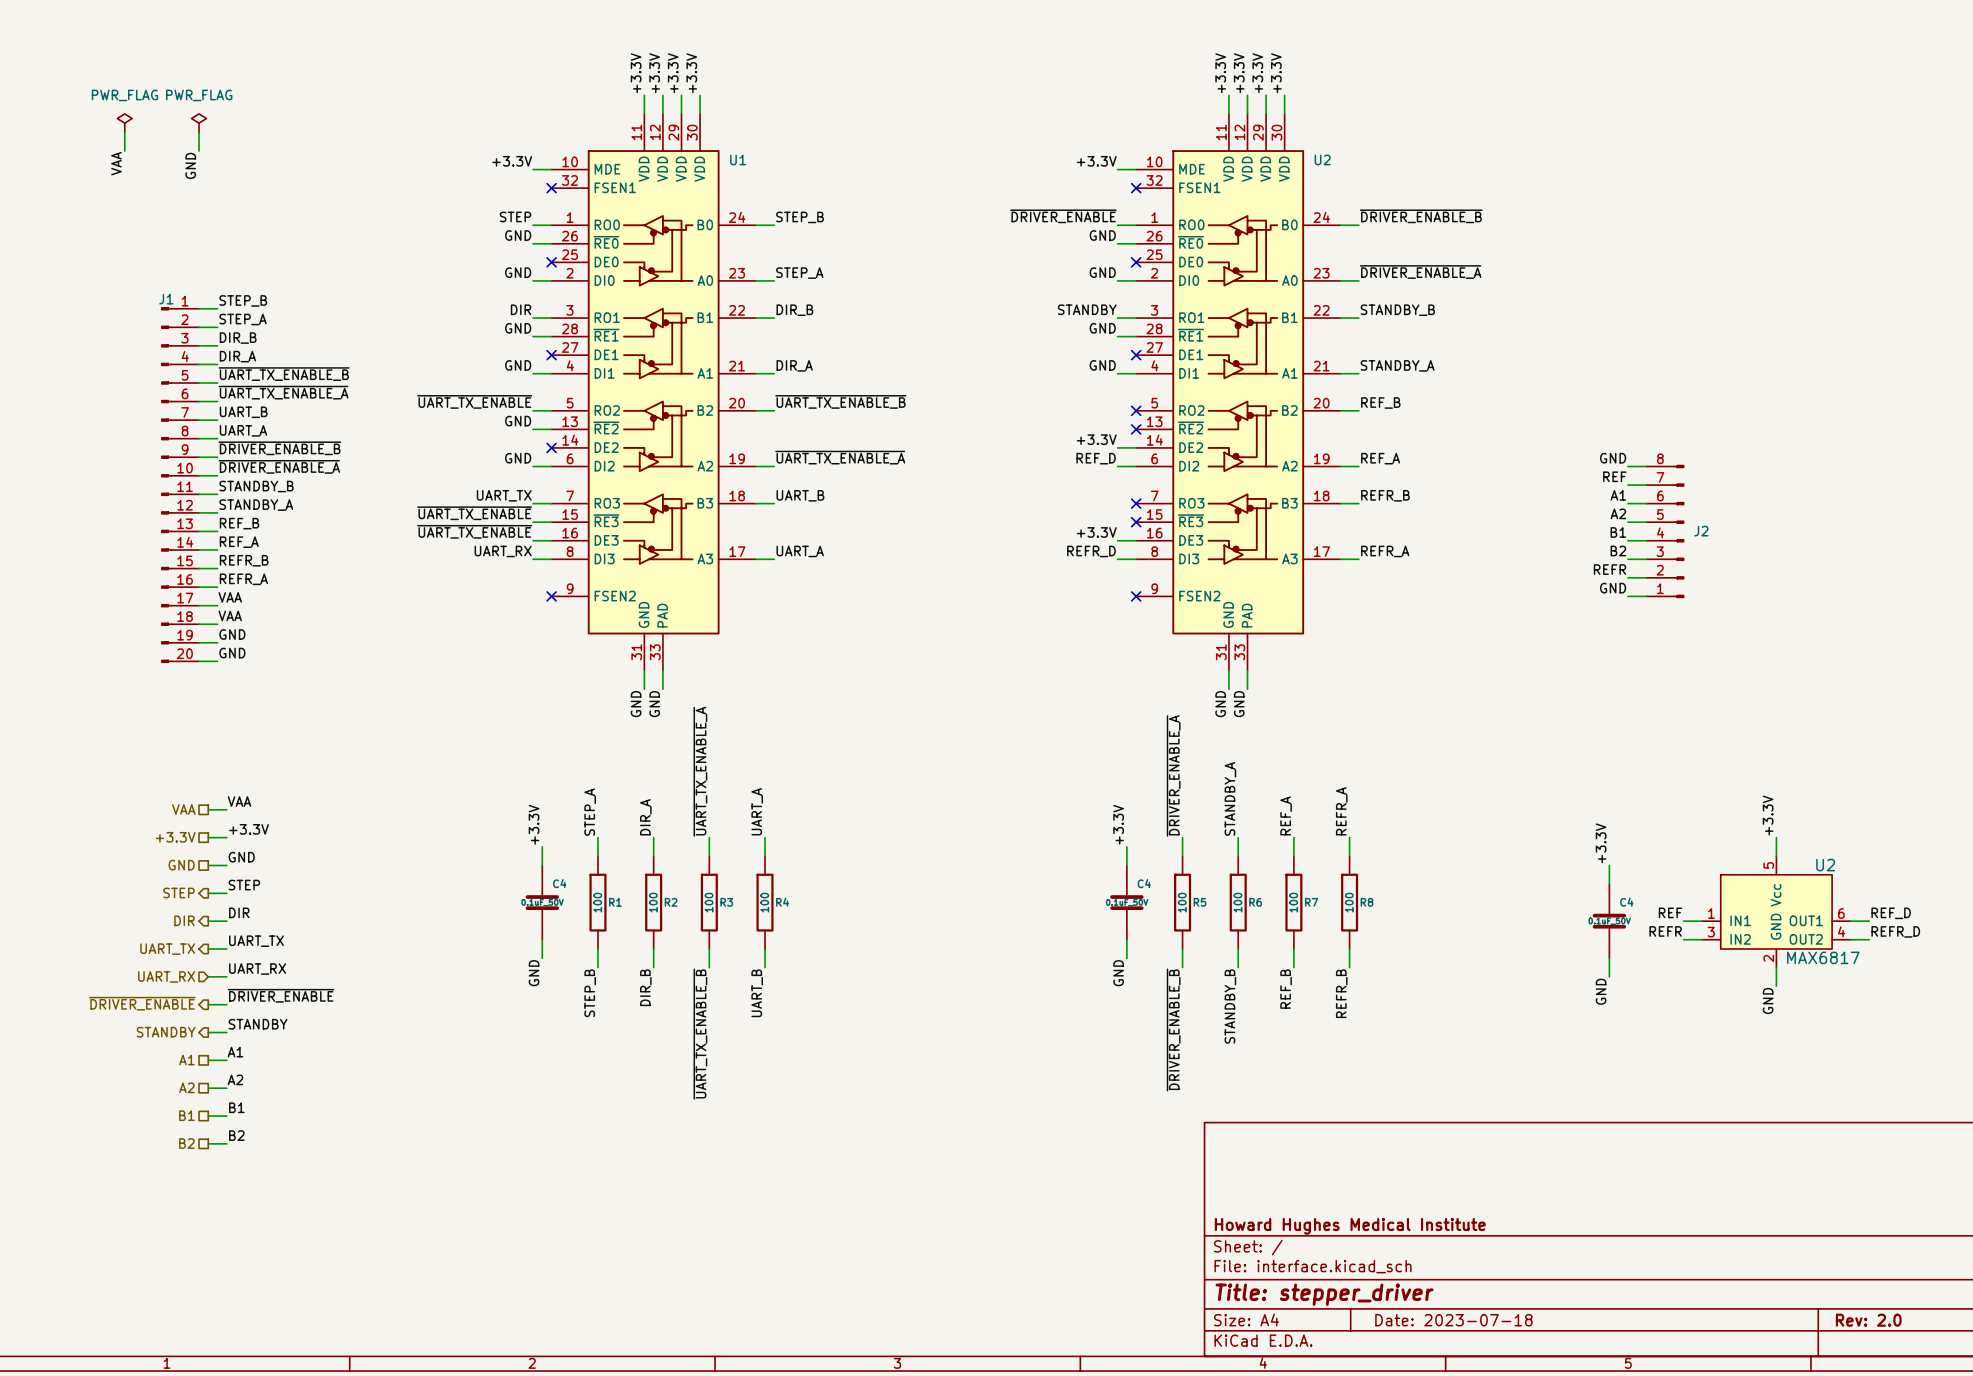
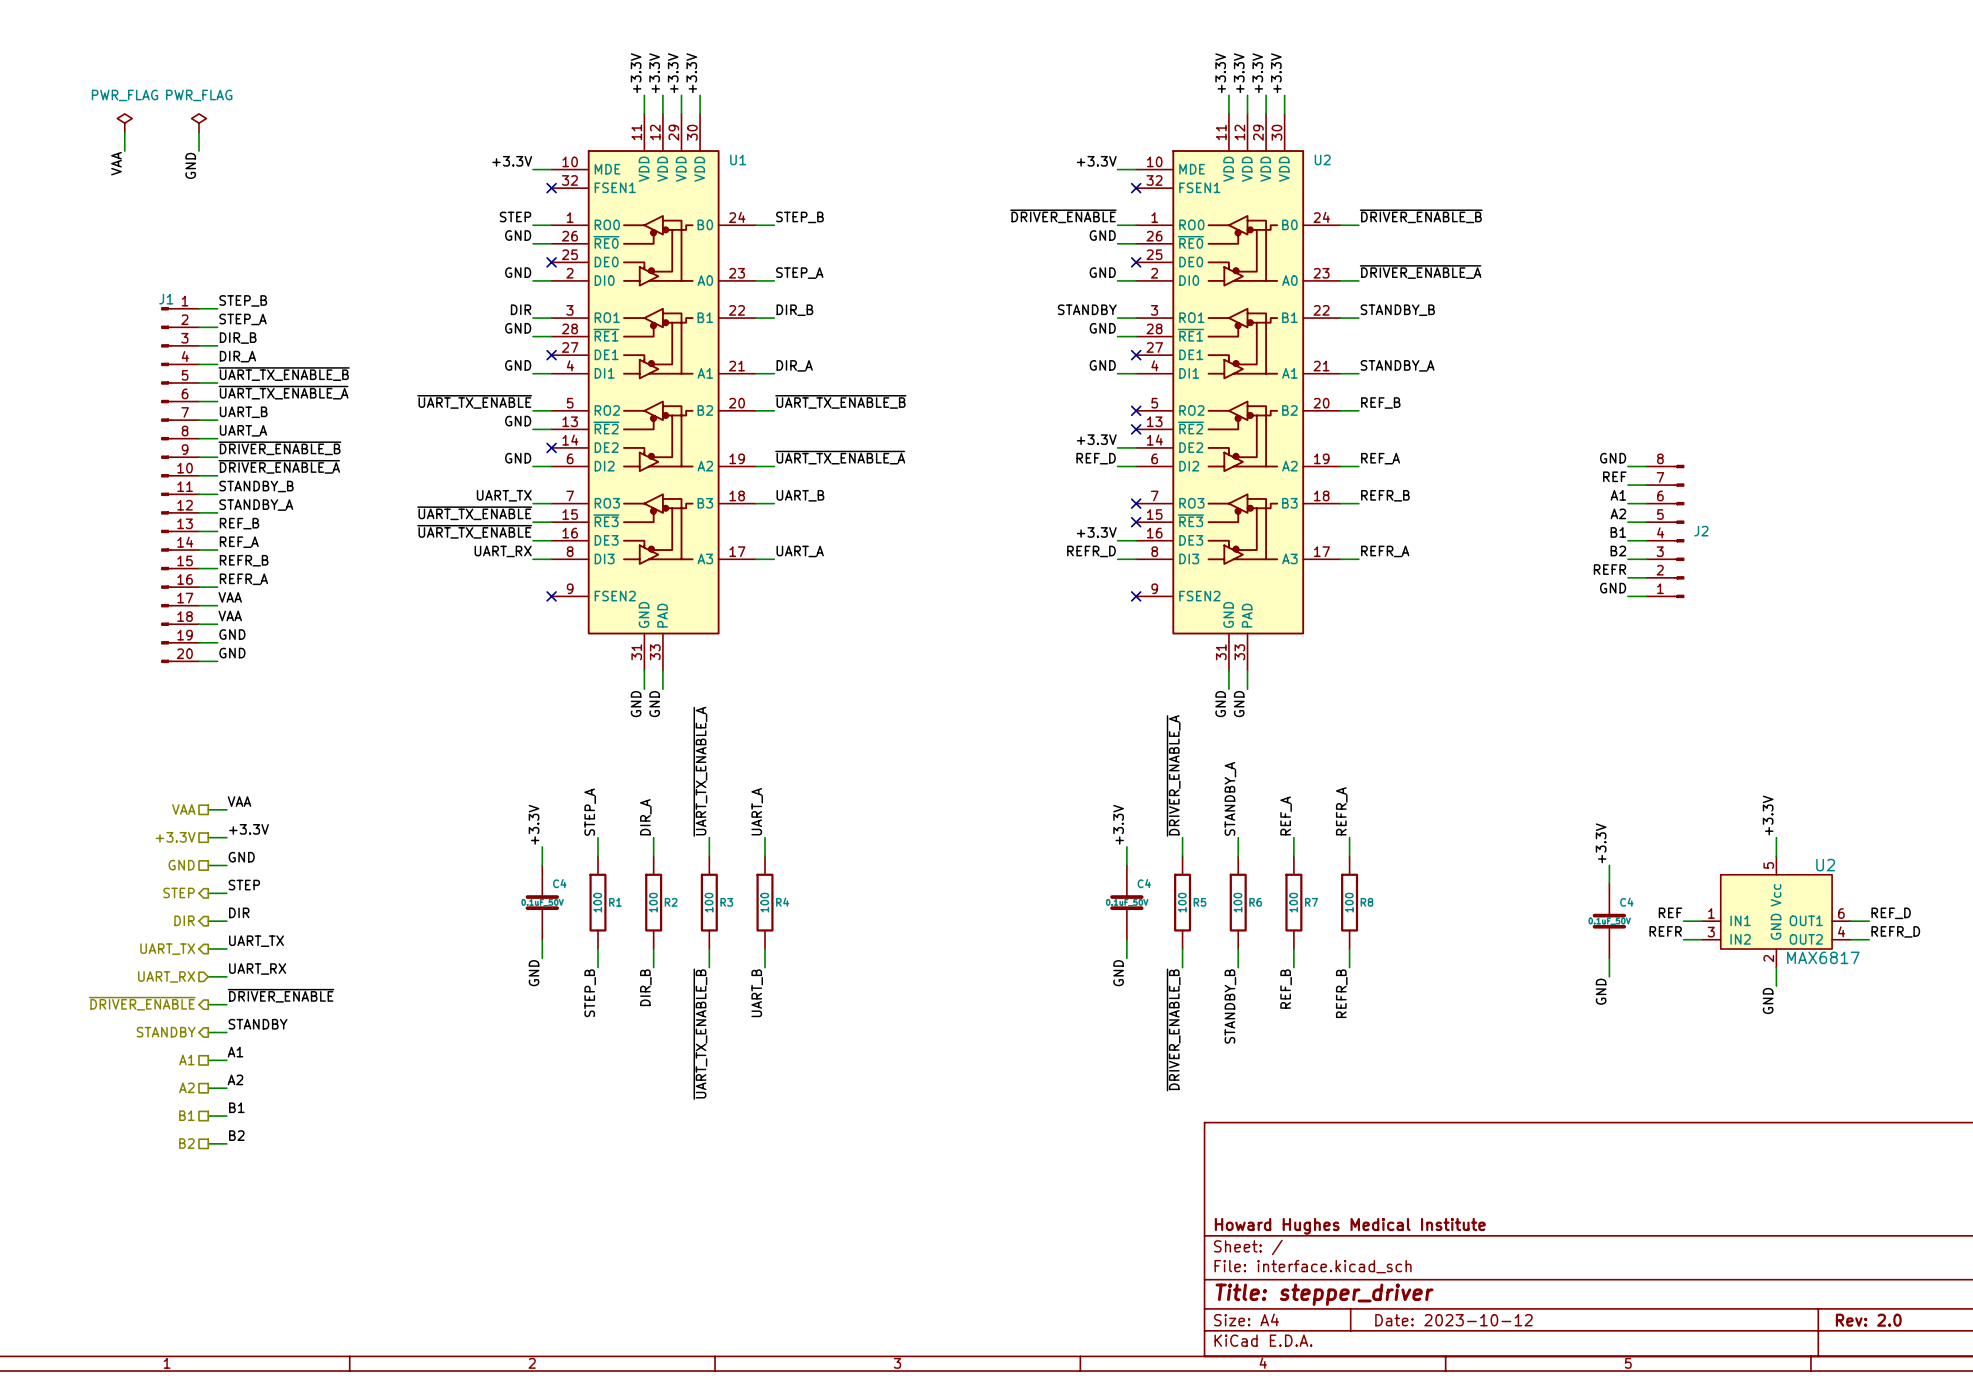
title block: Date: 2023-07-18 (1453, 1320) -> Date: 2023-10-12 (1453, 1320)

